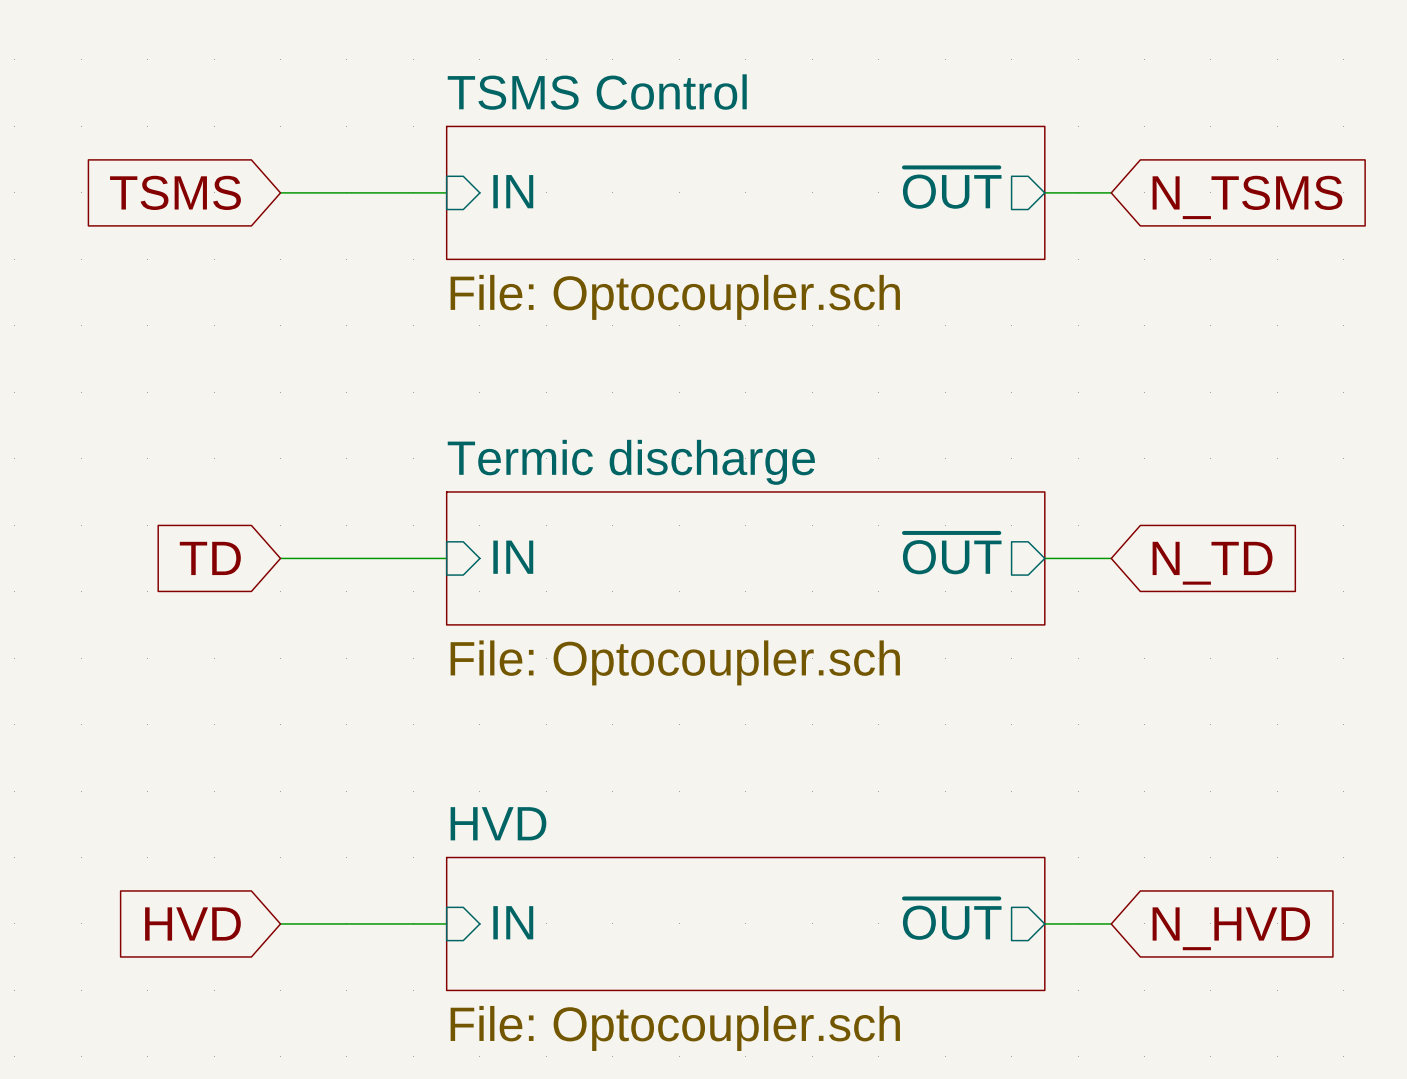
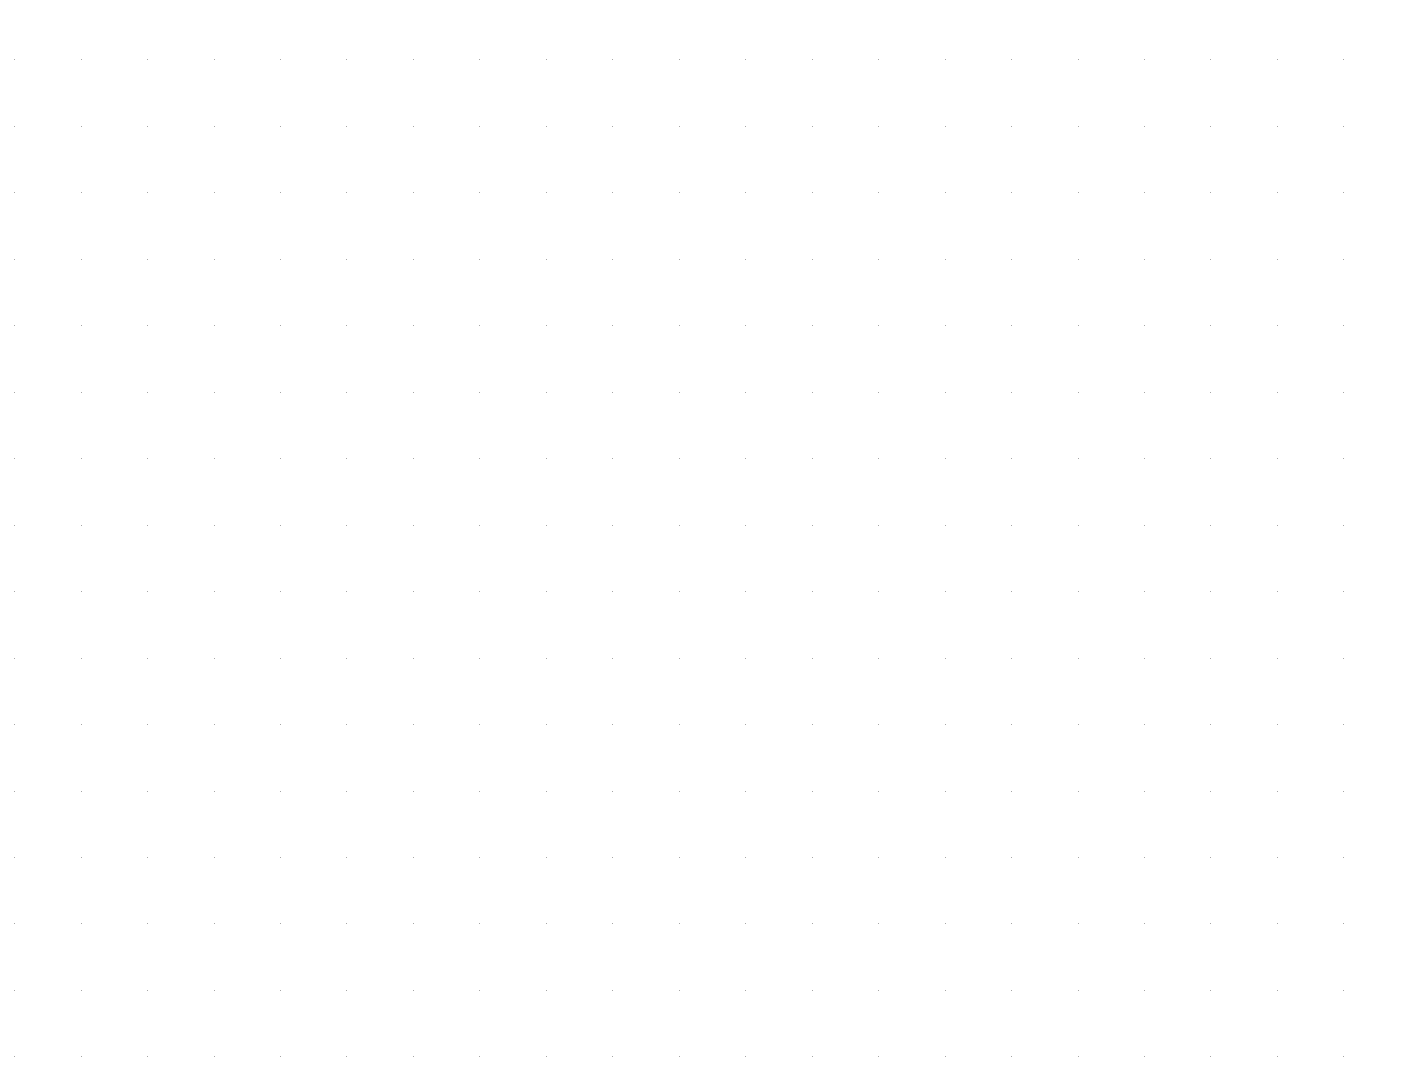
sheet pin: ~{OUT} (952, 188) -> none
sheet pin: IN (513, 191) -> none
global label: TSMS (175, 192) -> none
wire: (280, 192) (446, 192) -> none
sheet TSMS Control: File: Optocoupler.sch (745, 192) -> none
wire: (1044, 192) (1111, 192) -> none
global label: N_TSMS (1247, 197) -> none
sheet pin: ~{OUT} (952, 553) -> none
sheet pin: IN (513, 557) -> none
global label: TD (210, 558) -> none
wire: (280, 558) (446, 558) -> none
sheet Termic discharge: File: Optocoupler.sch (745, 558) -> none
wire: (1044, 558) (1111, 558) -> none
global label: N_TD (1212, 563) -> none
sheet pin: ~{OUT} (952, 919) -> none
sheet pin: IN (513, 922) -> none
global label: HVD (192, 923) -> none
wire: (280, 923) (446, 923) -> none
sheet HVD: File: Optocoupler.sch (745, 923) -> none
wire: (1044, 923) (1111, 923) -> none
global label: N_HVD (1231, 928) -> none

